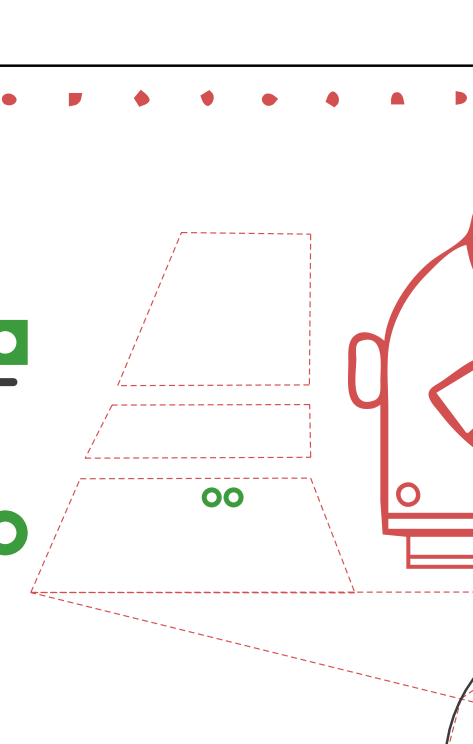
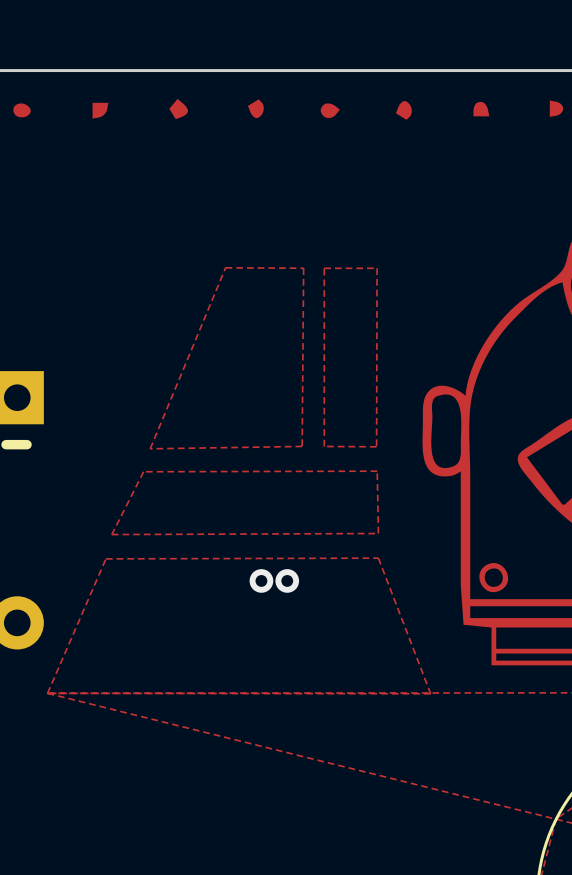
zone outline: (181, 232) (310, 234) (309, 384) (117, 385) -> (225, 267) (303, 268) (302, 446) (150, 448)
zone outline: none -> (324, 268) (377, 268) (376, 446) (324, 446) (324, 268)

